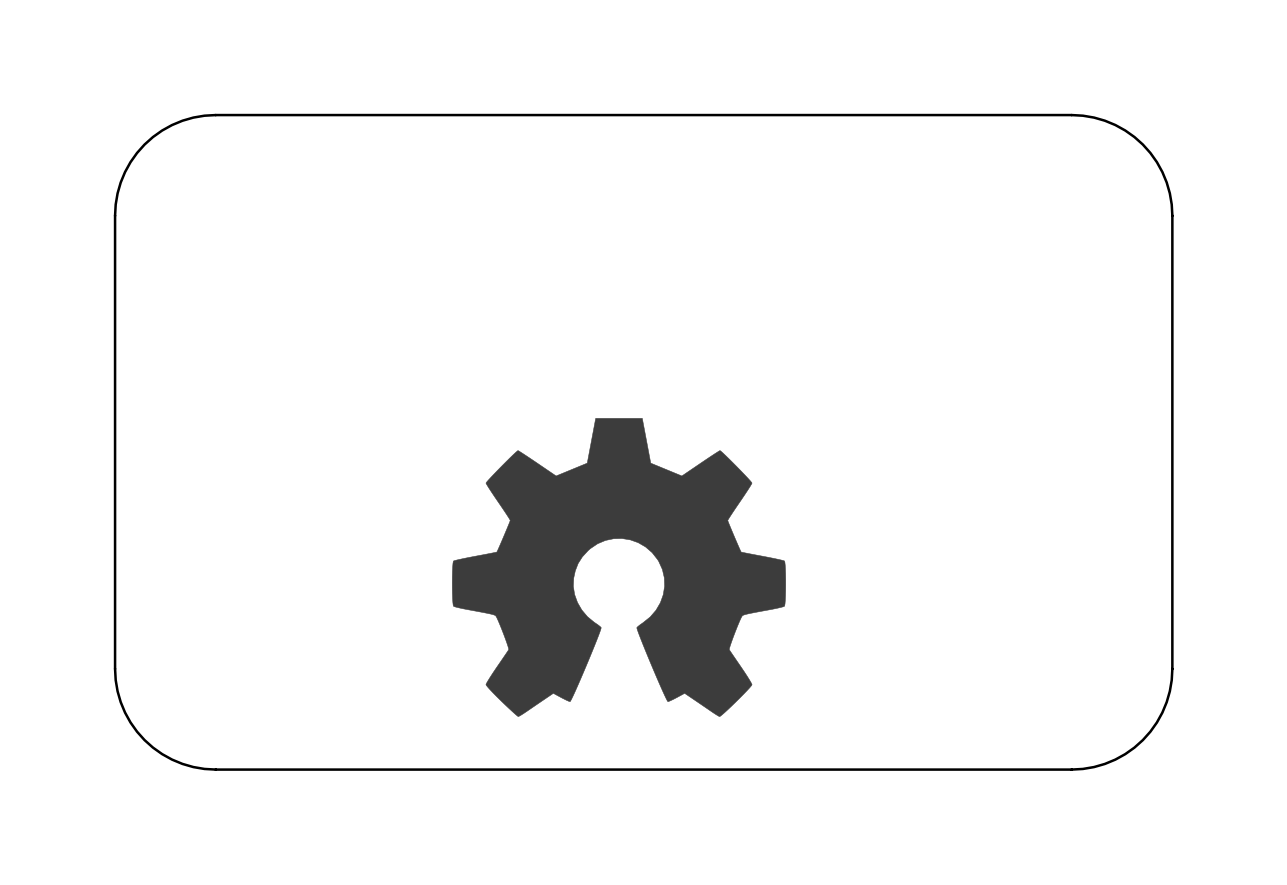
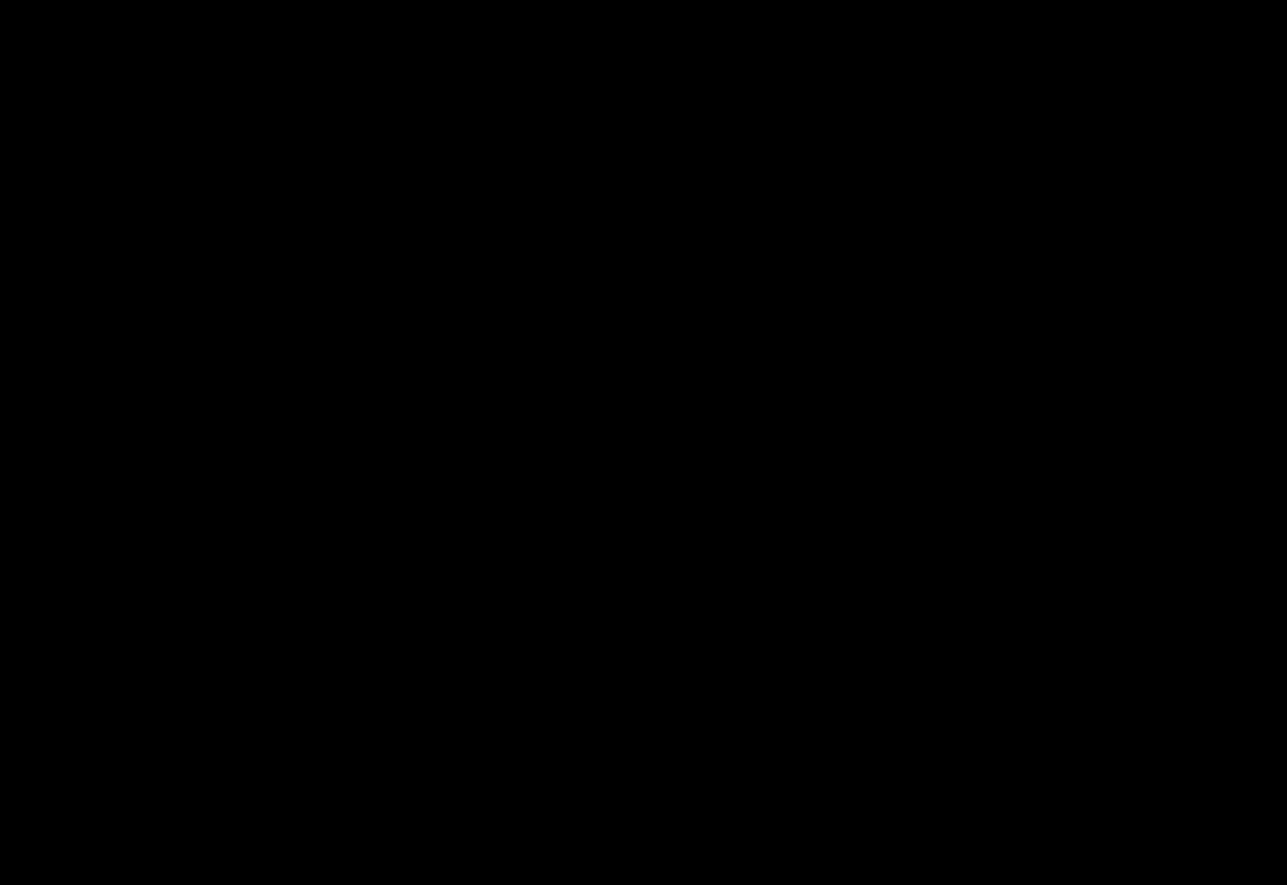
board edge: (215, 115) (1071, 115) (1094, 117) (1125, 130) (1142, 144) (1156, 162) (1166, 182) (1172, 215) (1172, 668) (1166, 702) (1156, 722) (1142, 740) (1115, 759) (1094, 767) (1071, 769) (215, 769) (182, 763) (162, 754) (144, 740) (130, 722) (120, 702) (115, 680) (115, 204) (125, 172) (144, 144) (172, 125) (193, 117) (215, 115) -> none
drawing: [452, 418, 786, 717] -> none

